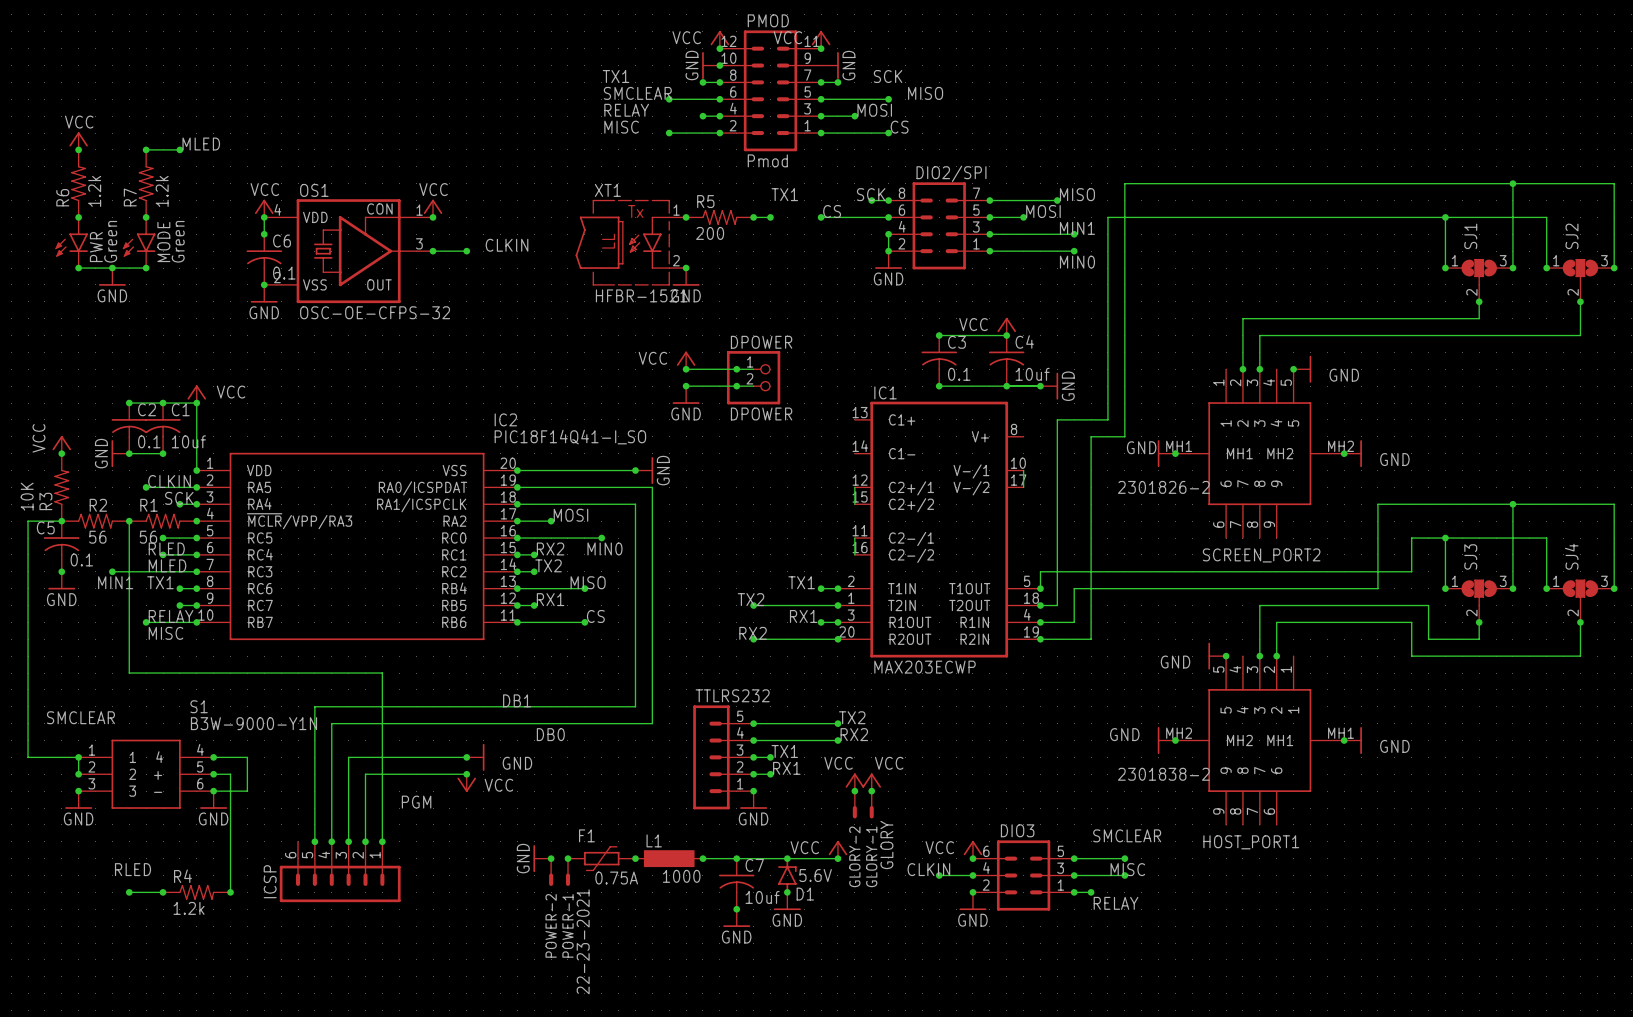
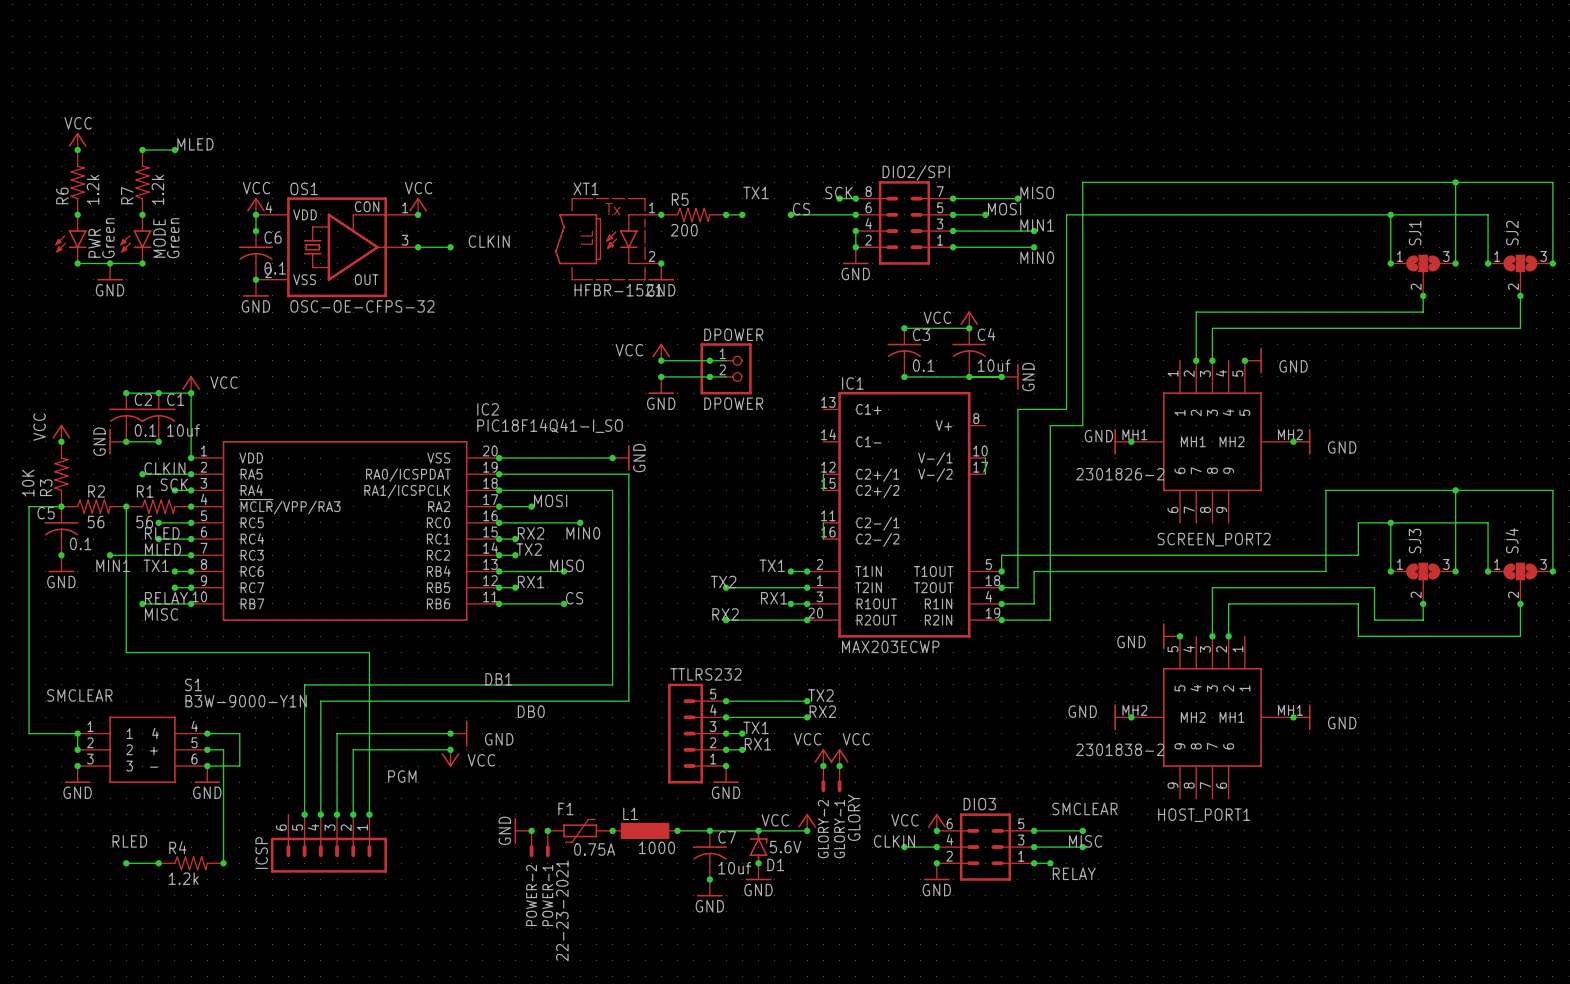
power symbol: VCC (719, 39) -> none
power symbol: VCC (821, 39) -> none
junction: (719, 48) -> none
junction: (821, 48) -> none
power symbol: GND (711, 65) -> none
junction: (719, 65) -> none
power symbol: GND (829, 65) -> none
label: TX1 (616, 76) -> none
label: SCK (888, 76) -> none
wire: (702, 82) (719, 82) -> none
junction: (702, 82) -> none
junction: (719, 82) -> none
wire: (821, 82) (837, 82) -> none
junction: (821, 82) -> none
junction: (837, 82) -> none
PMOD: Pmod (770, 90) -> none
label: SMCLEAR (637, 93) -> none
label: MISO (925, 93) -> none
wire: (669, 99) (719, 99) -> none
junction: (669, 99) -> none
junction: (719, 99) -> none
wire: (821, 99) (888, 99) -> none
junction: (821, 99) -> none
junction: (888, 99) -> none
label: RELAY (626, 110) -> none
label: MOSI (874, 110) -> none
wire: (702, 116) (719, 116) -> none
junction: (702, 116) -> none
junction: (719, 116) -> none
wire: (821, 116) (854, 116) -> none
junction: (821, 116) -> none
junction: (854, 116) -> none
label: MISC (621, 127) -> none
label: CS (899, 127) -> none
wire: (669, 133) (719, 133) -> none
junction: (669, 133) -> none
junction: (719, 133) -> none
wire: (821, 133) (888, 133) -> none
junction: (821, 133) -> none
junction: (888, 133) -> none

